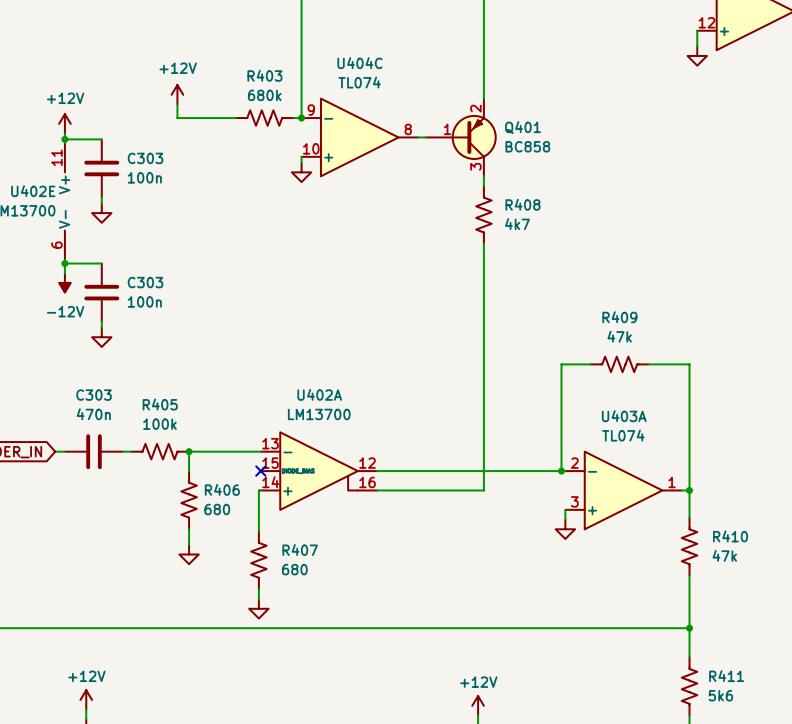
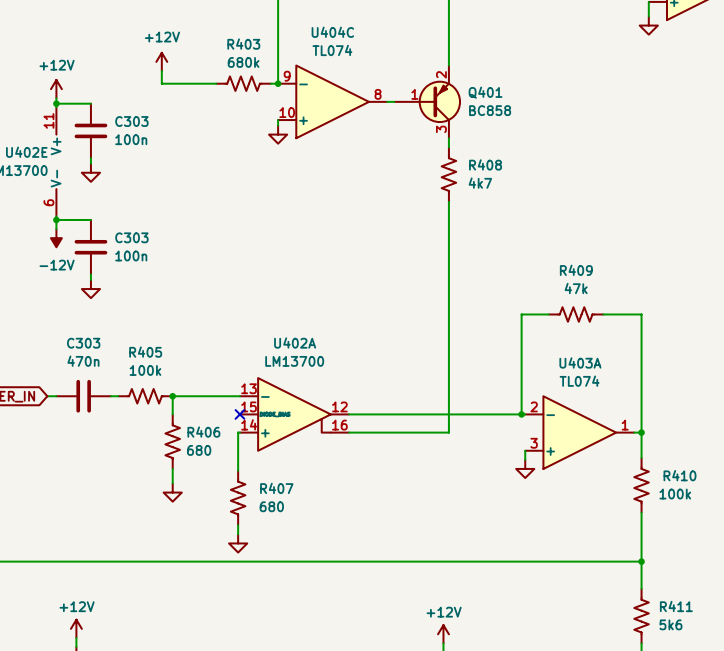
R410 value: 47k (724, 555) -> 100k (675, 494)

